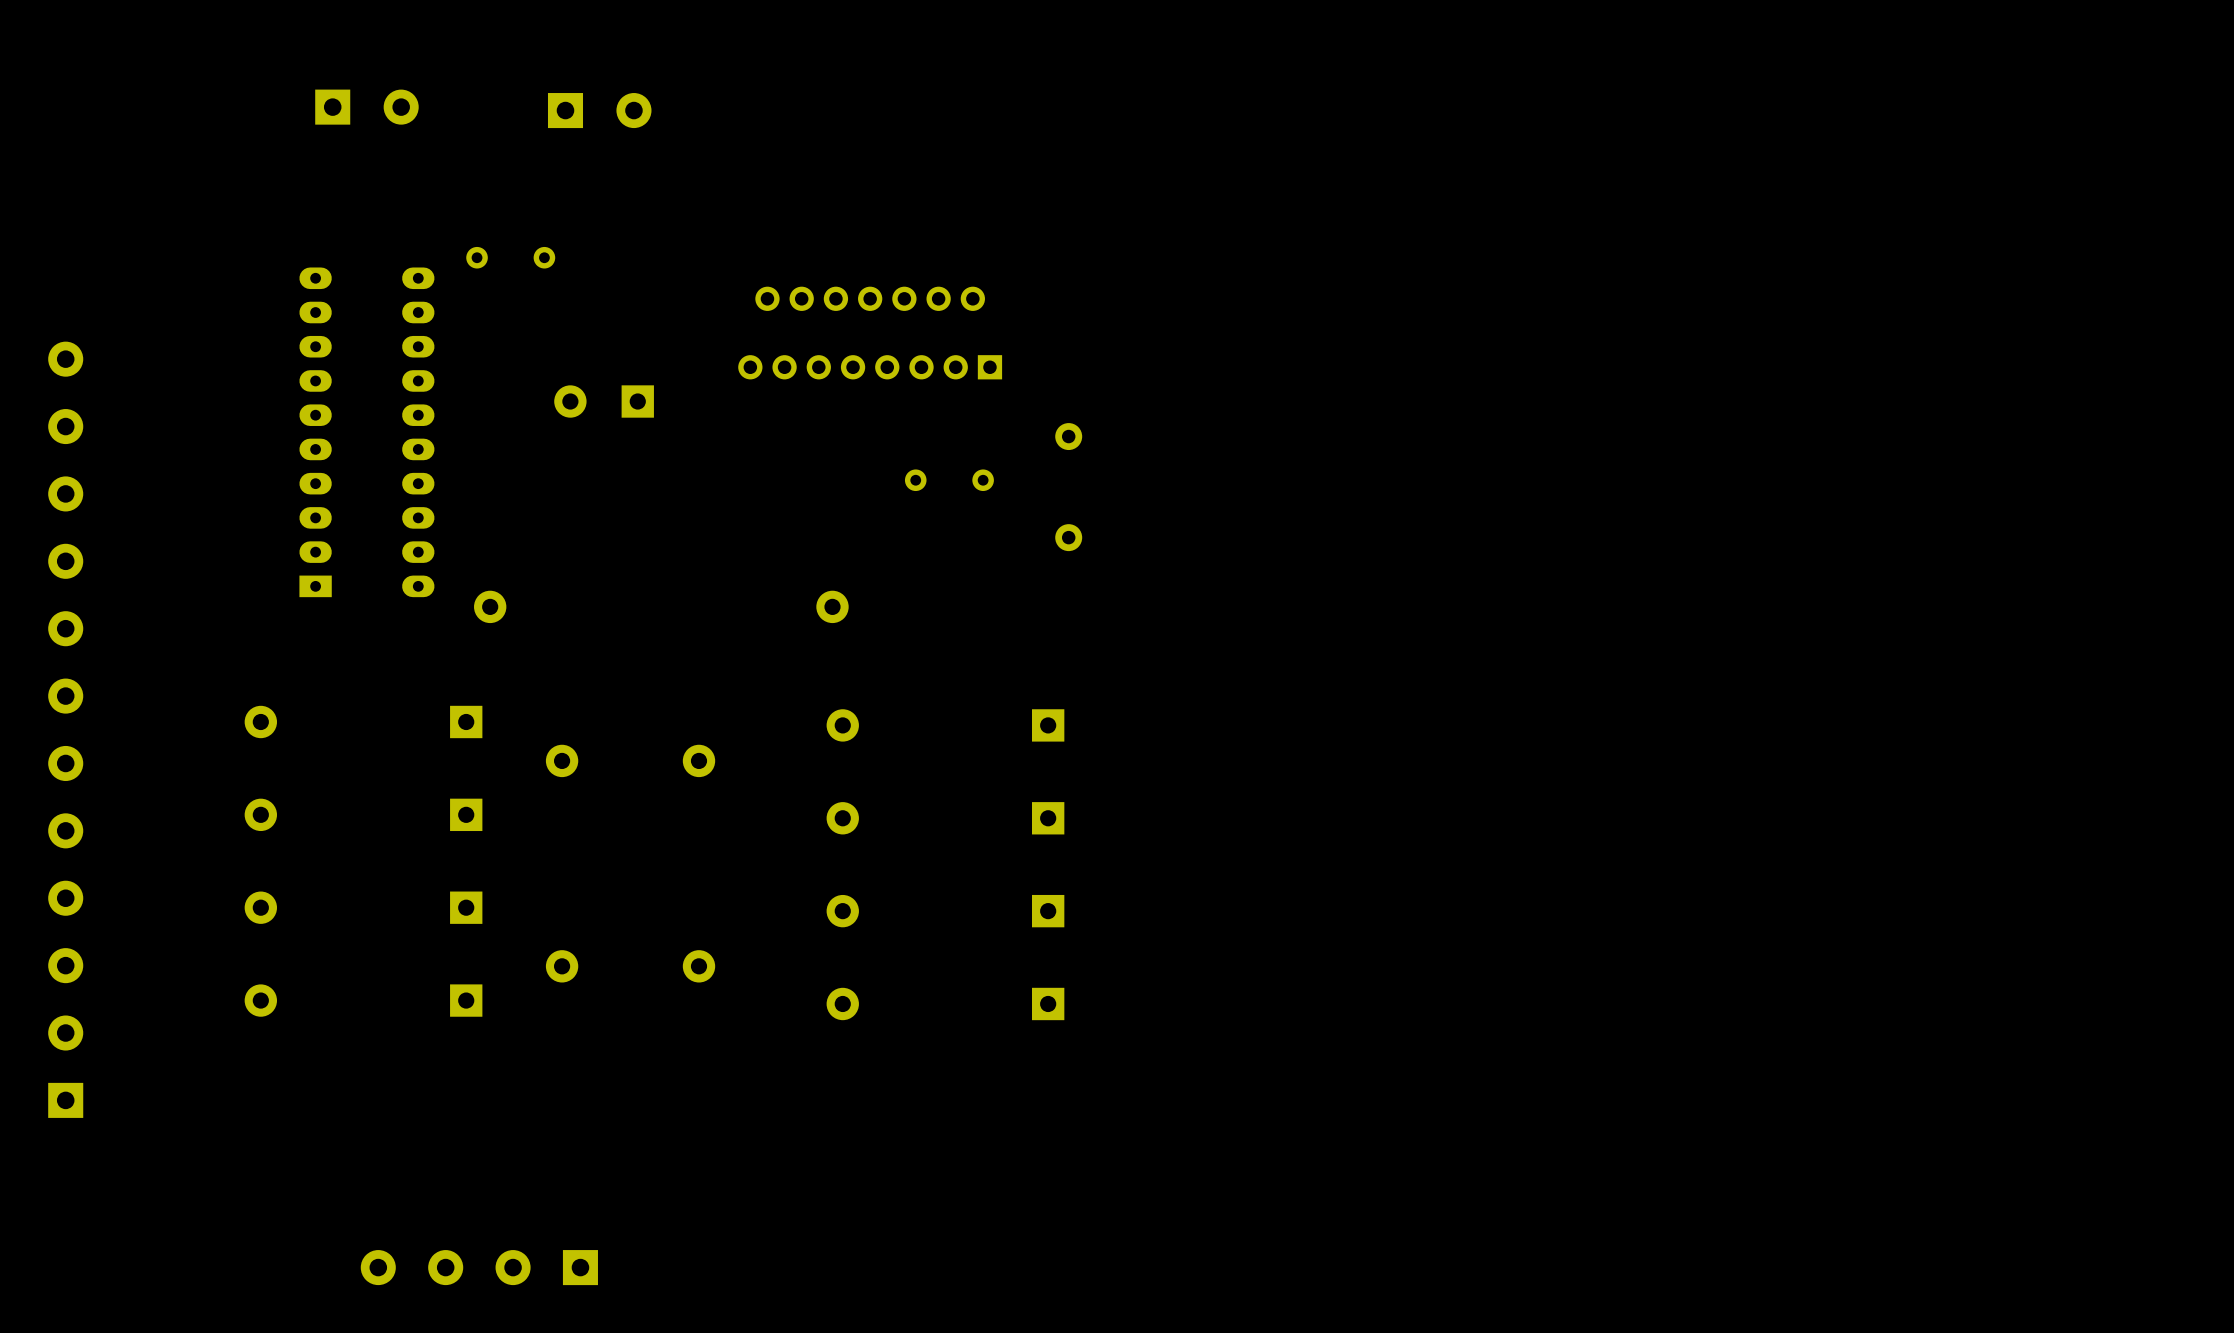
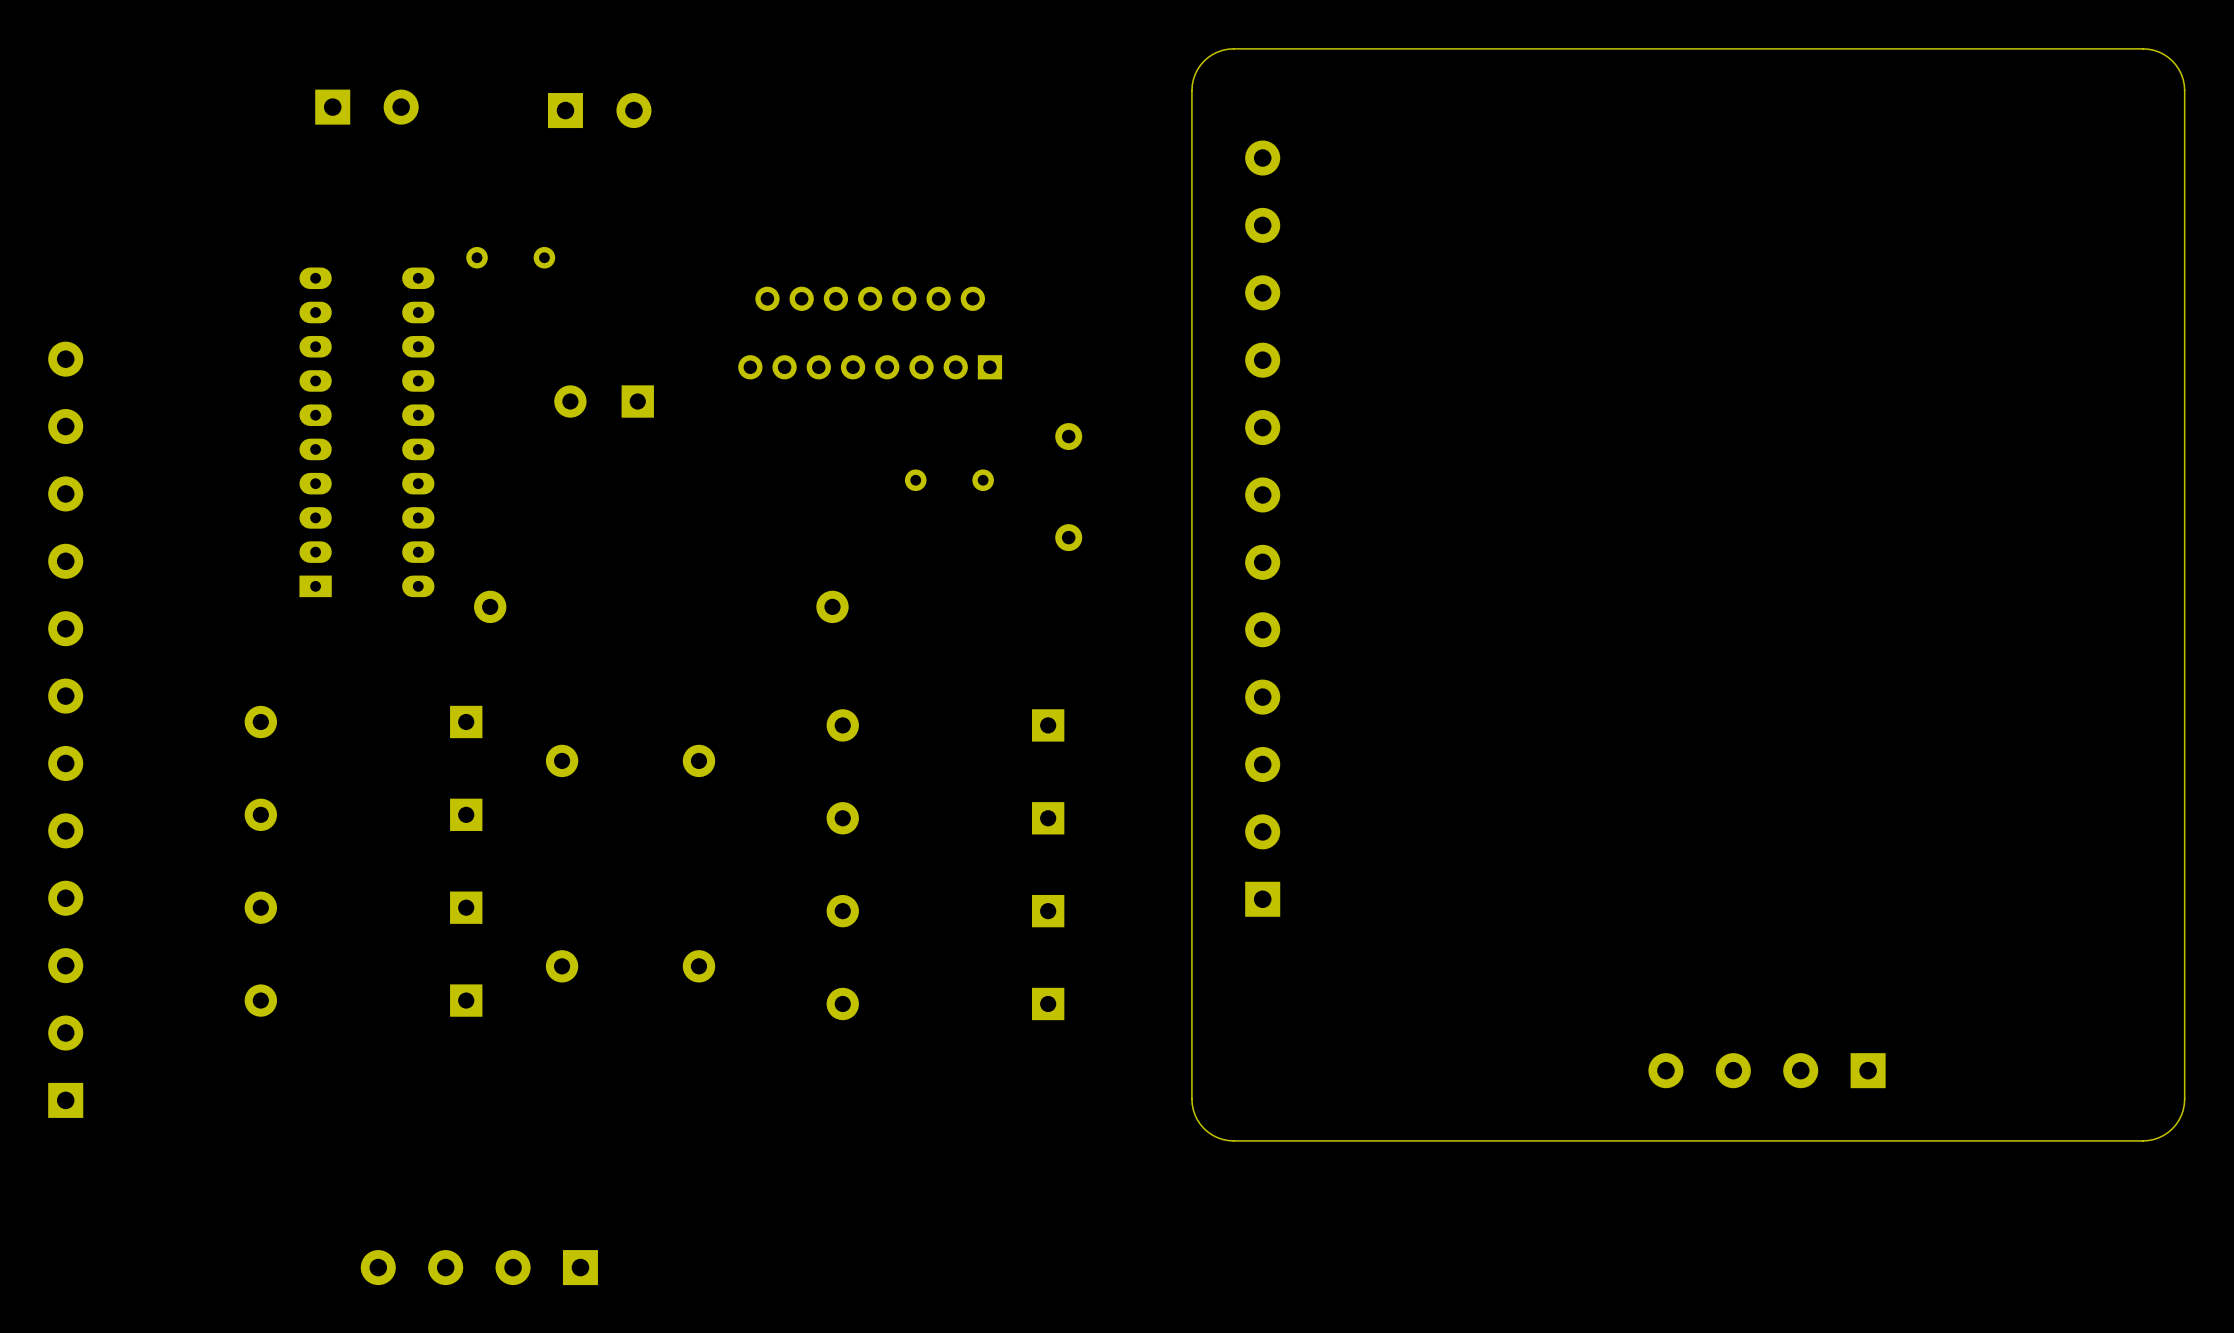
board edge: none -> (2143, 48) (1233, 48) (1217, 52) (1200, 65) (1195, 74) (1191, 90) (1191, 1099) (1195, 1115) (1208, 1132) (1217, 1137) (1233, 1140) (2143, 1140) (2158, 1137) (2176, 1124) (2183, 1110) (2184, 1099) (2184, 90) (2181, 74) (2172, 61) (2158, 52) (2143, 48)
part: none -> (1262, 528)
part: none -> (1767, 1070)

